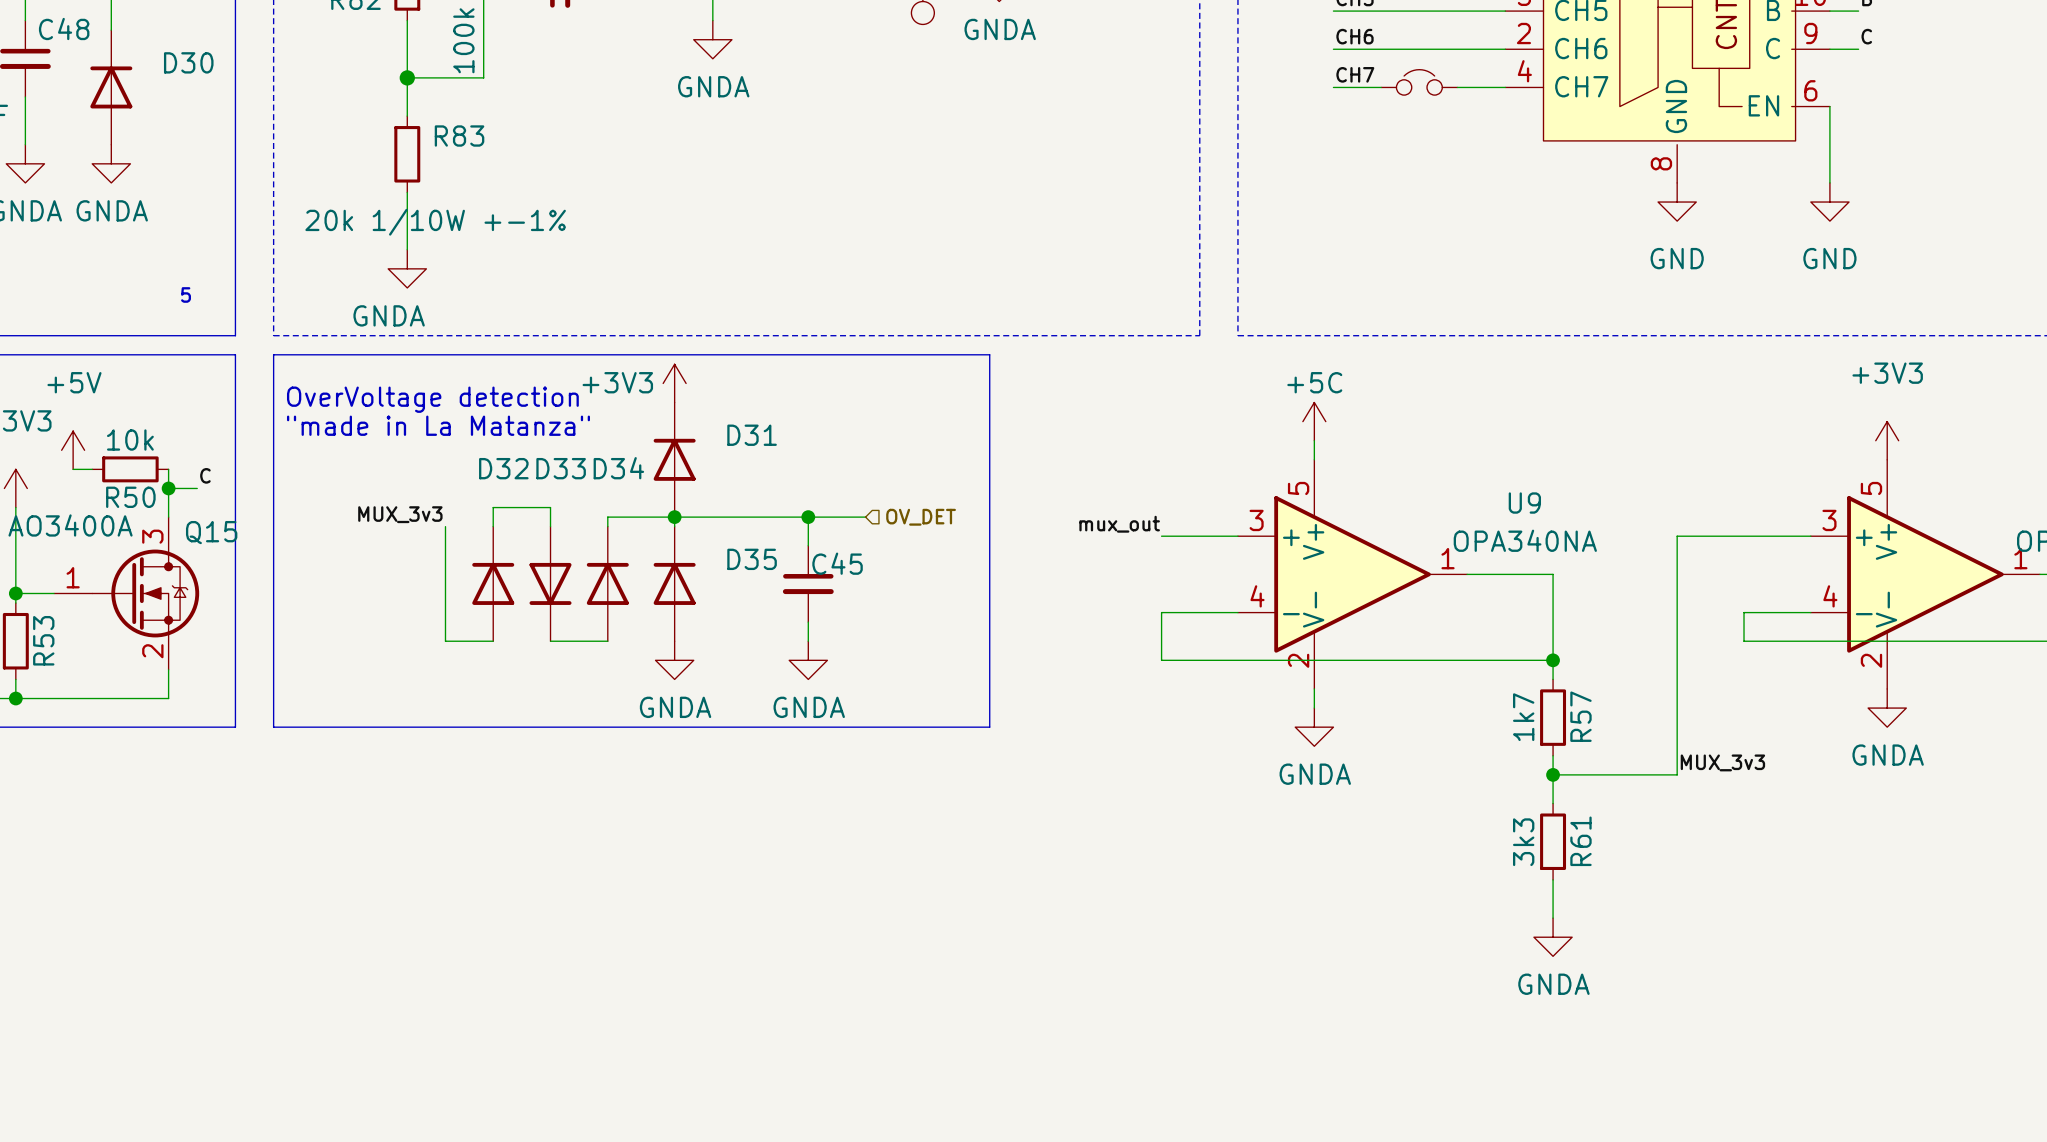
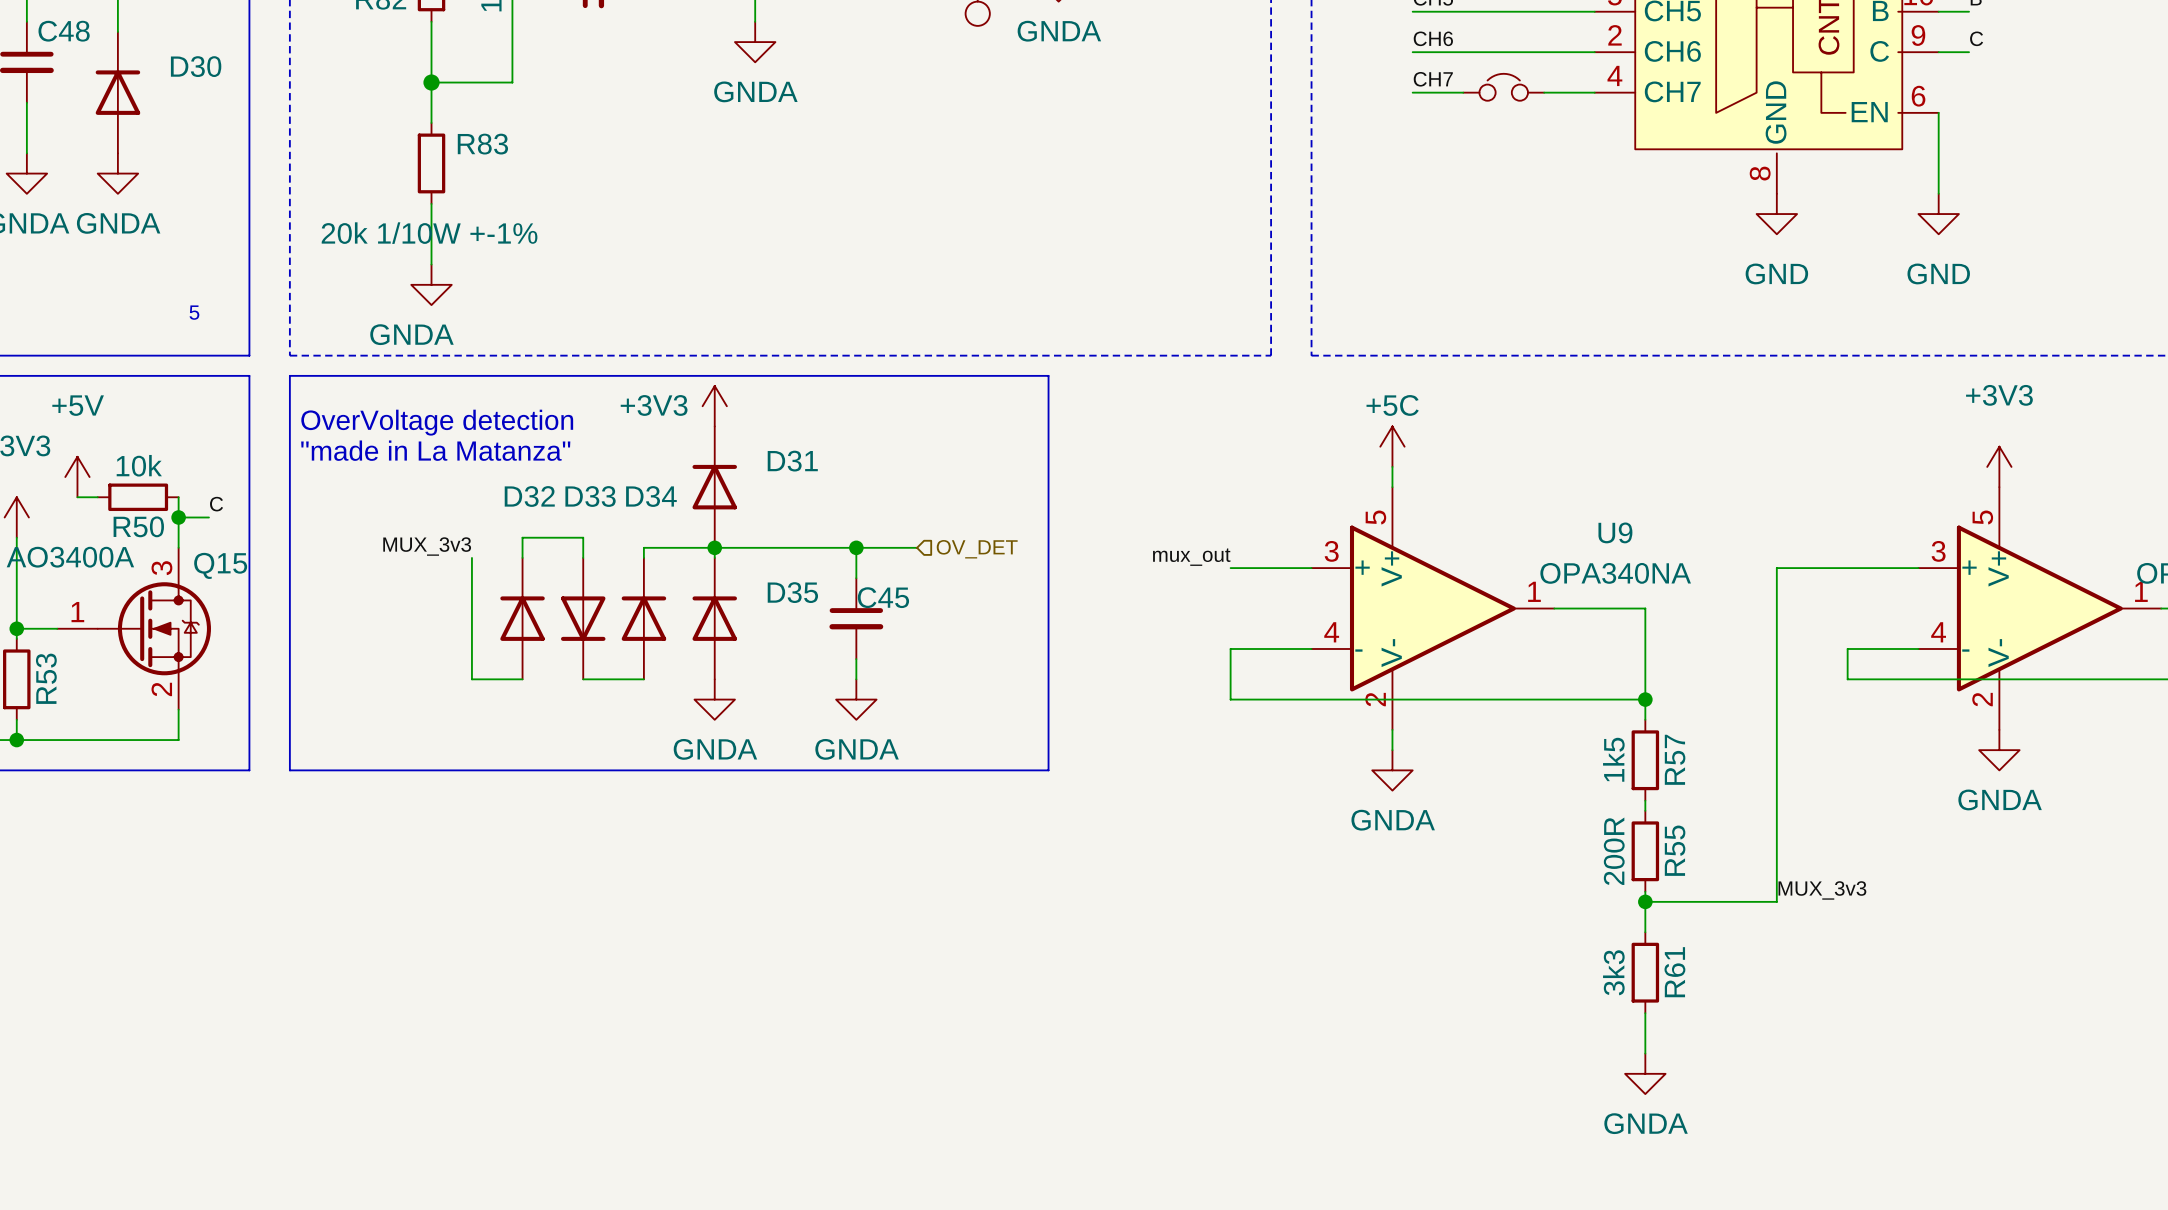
R57 value: 1k7 (1523, 717) -> 1k5 (1613, 759)
label position: MUX_3v3 (1722, 762) -> MUX_3v3 (1822, 890)
wire: (1553, 765) (1553, 803) -> (1645, 1013) (1645, 1053)
wire: (1553, 774) (1677, 774) -> (1645, 901) (1776, 901) (1776, 820)
junction position: (1553, 774) -> (1645, 901)
R55: none -> 200R (1645, 851)
R61 position: (1553, 841) -> (1645, 972)
wire: (1553, 879) (1553, 918) -> (1645, 932) (1645, 891)
power symbol position: GNDA (1553, 937) -> GNDA (1645, 1073)

